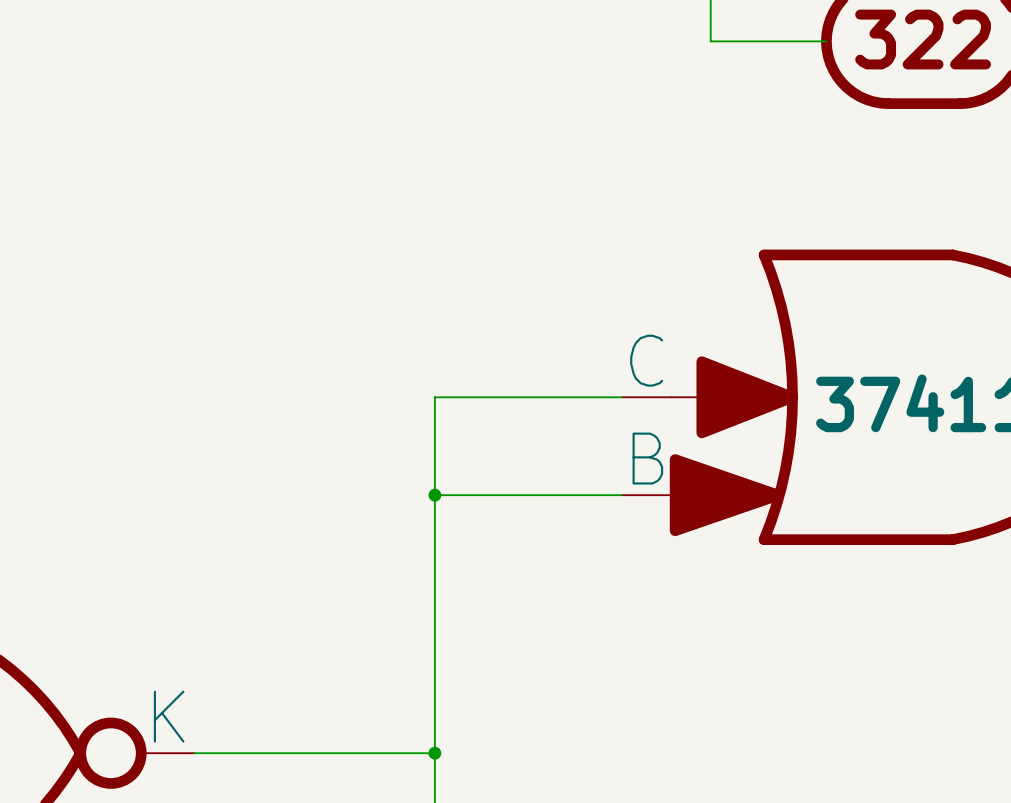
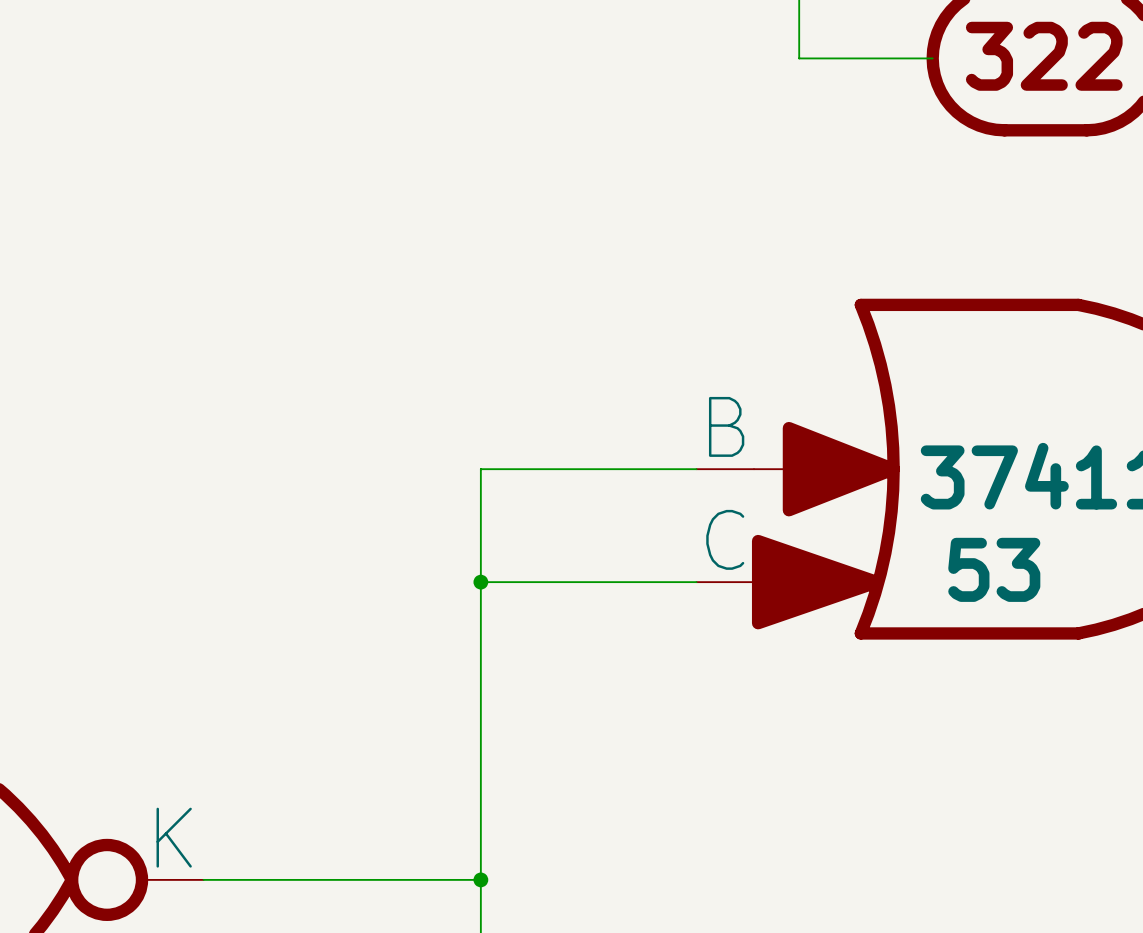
part pin name: C (646, 360) -> B (726, 426)
part pin name: B (647, 458) -> C (725, 539)
part text: none -> 53 (994, 569)

